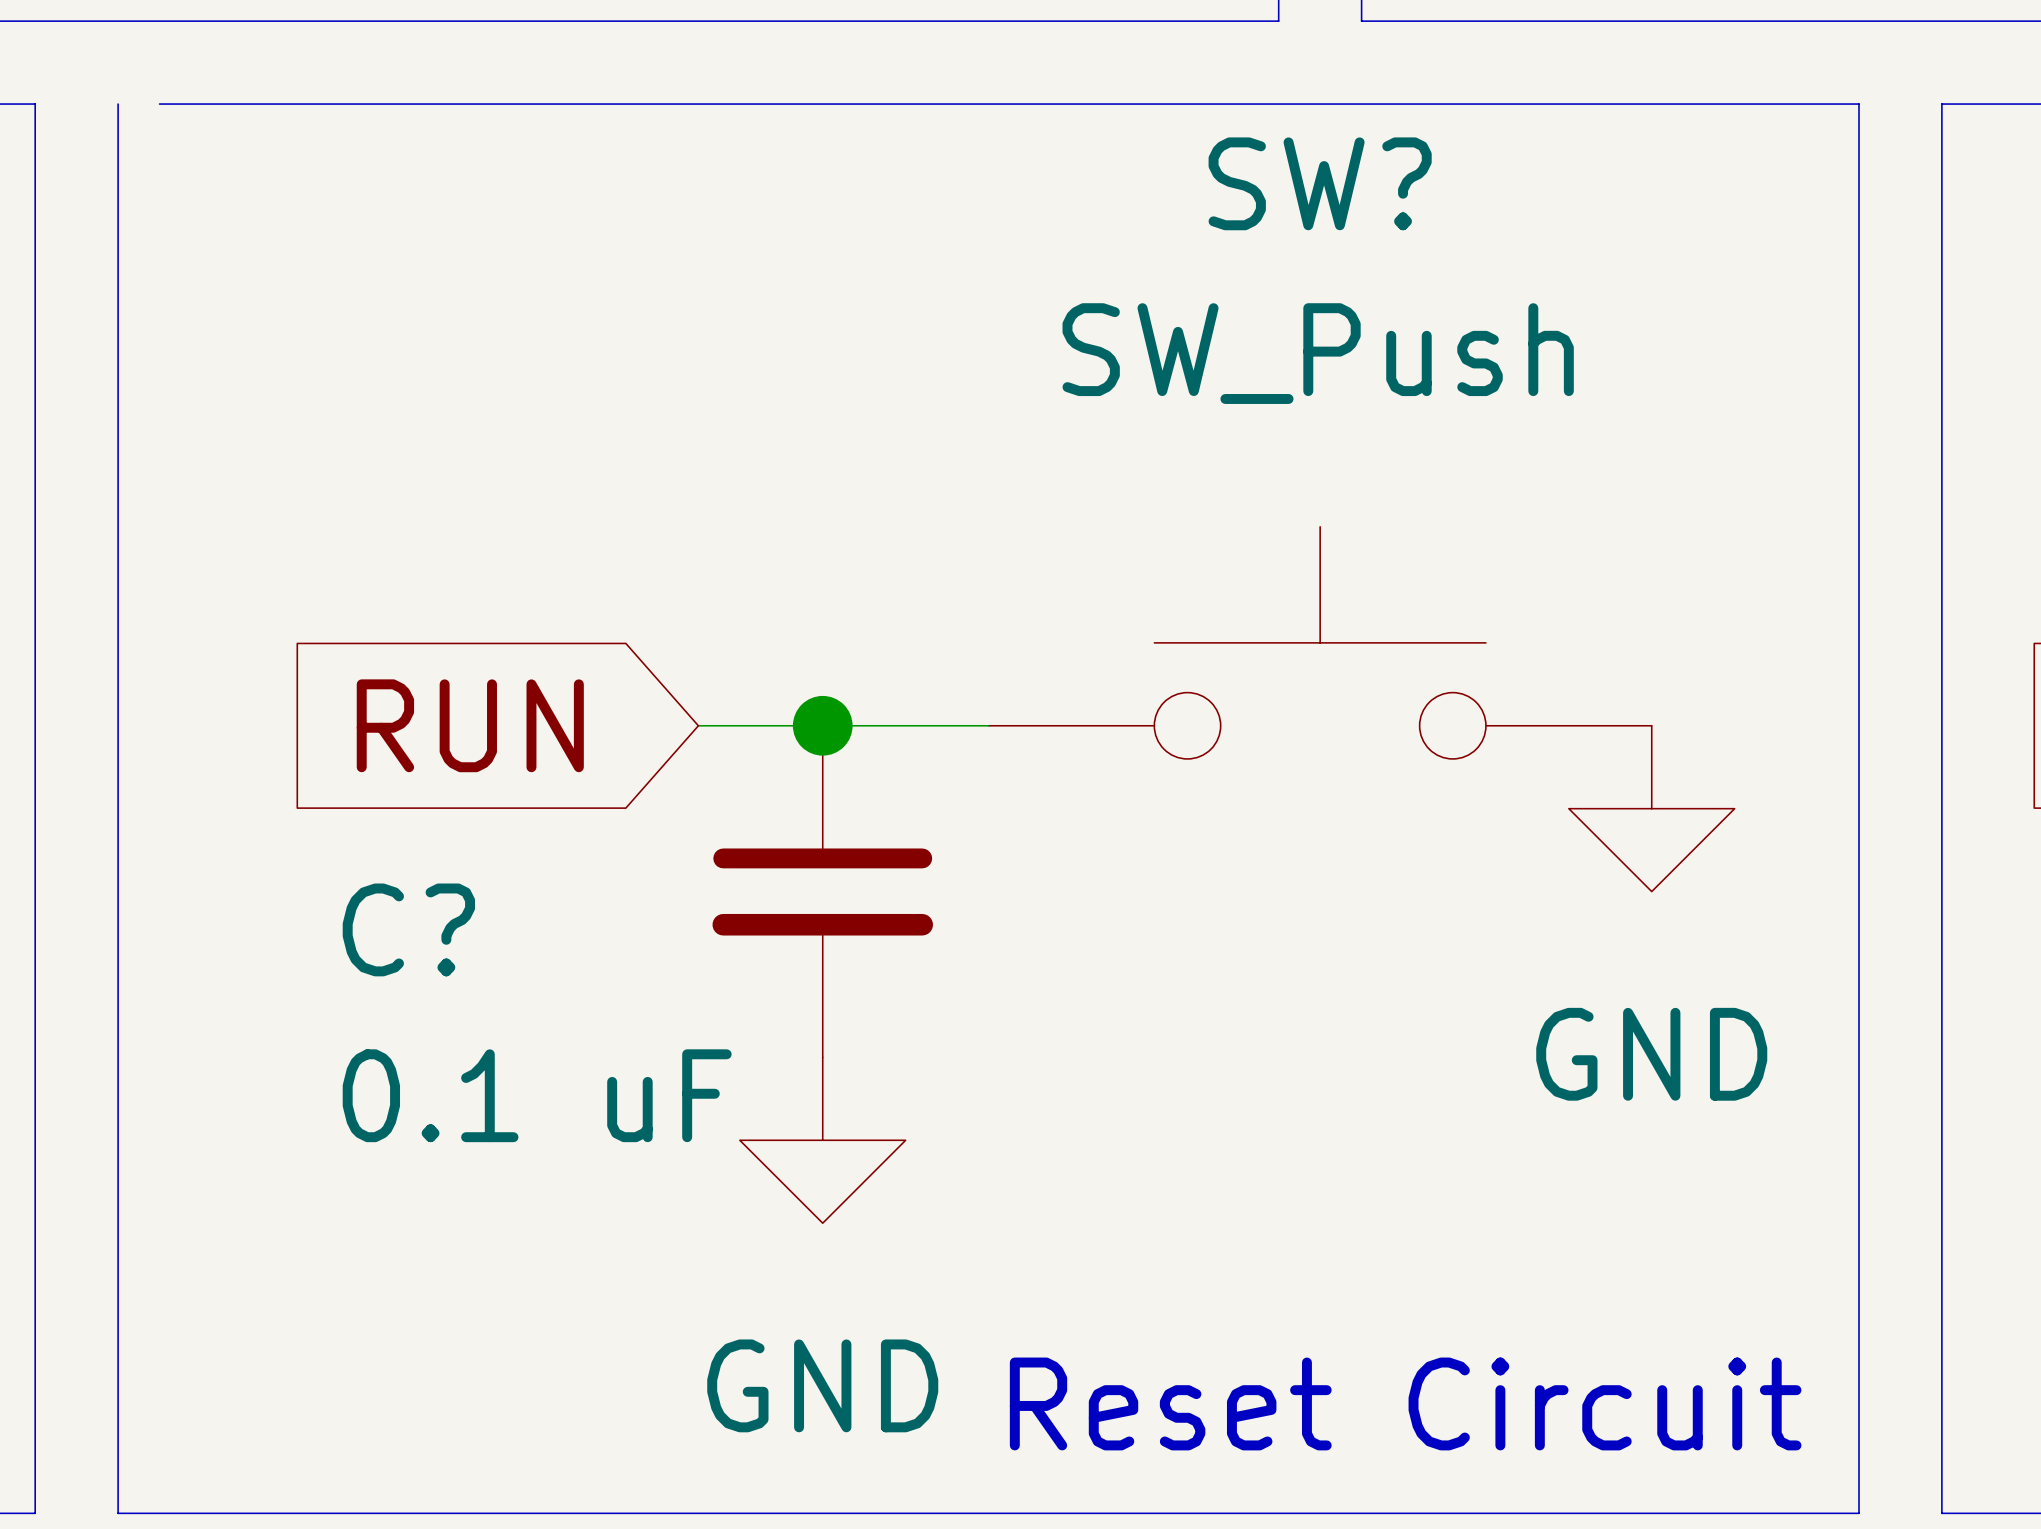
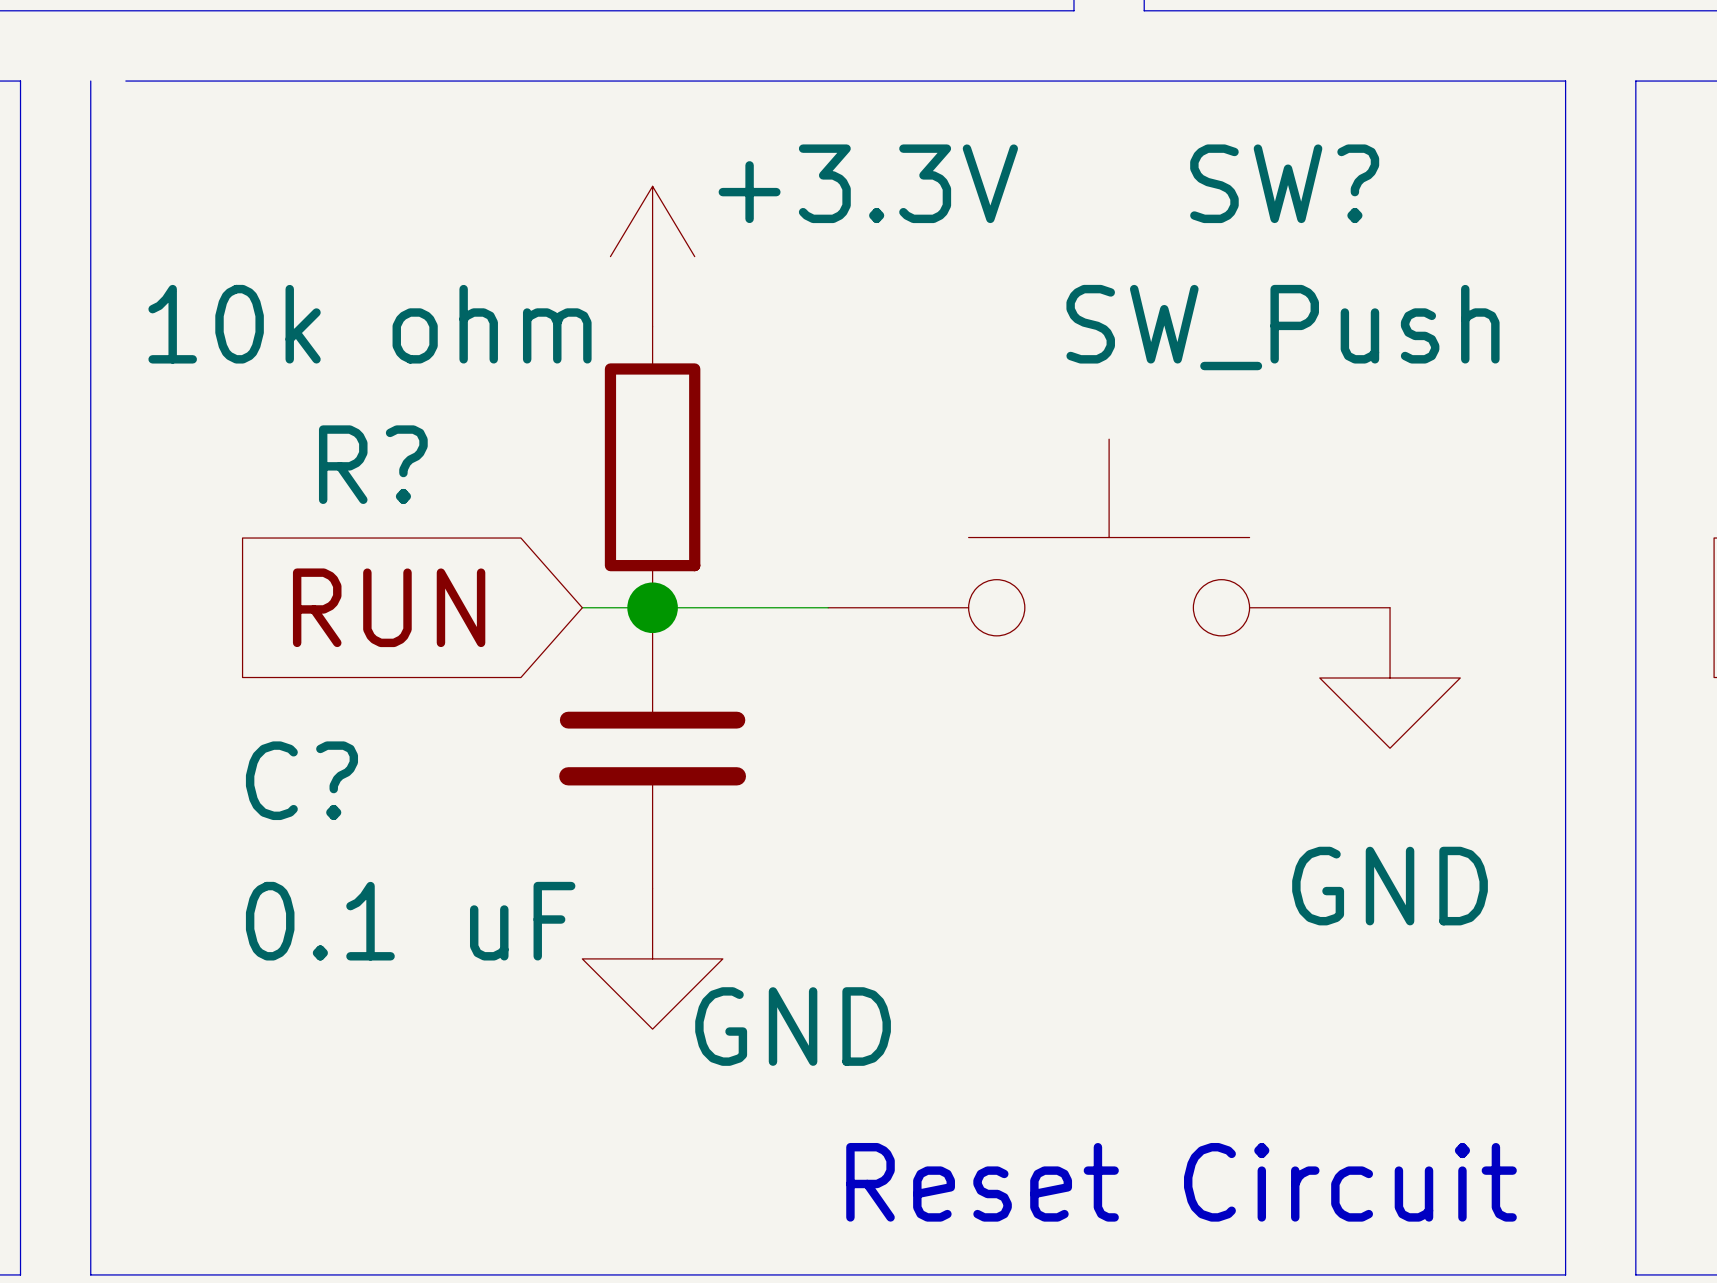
SW? name position: SW? (1320, 183) -> SW? (1284, 183)
power symbol: none -> +3.3V (652, 256)
SW? value position: SW_Push (1318, 353) -> SW_Push (1283, 327)
R?: none -> 10k ohm (652, 467)
junction position: (822, 725) -> (652, 607)
C? position: (822, 891) -> (652, 748)
power symbol position: GND (822, 1140) -> GND (652, 958)
power symbol text position: GND (822, 1385) -> GND (793, 1026)

